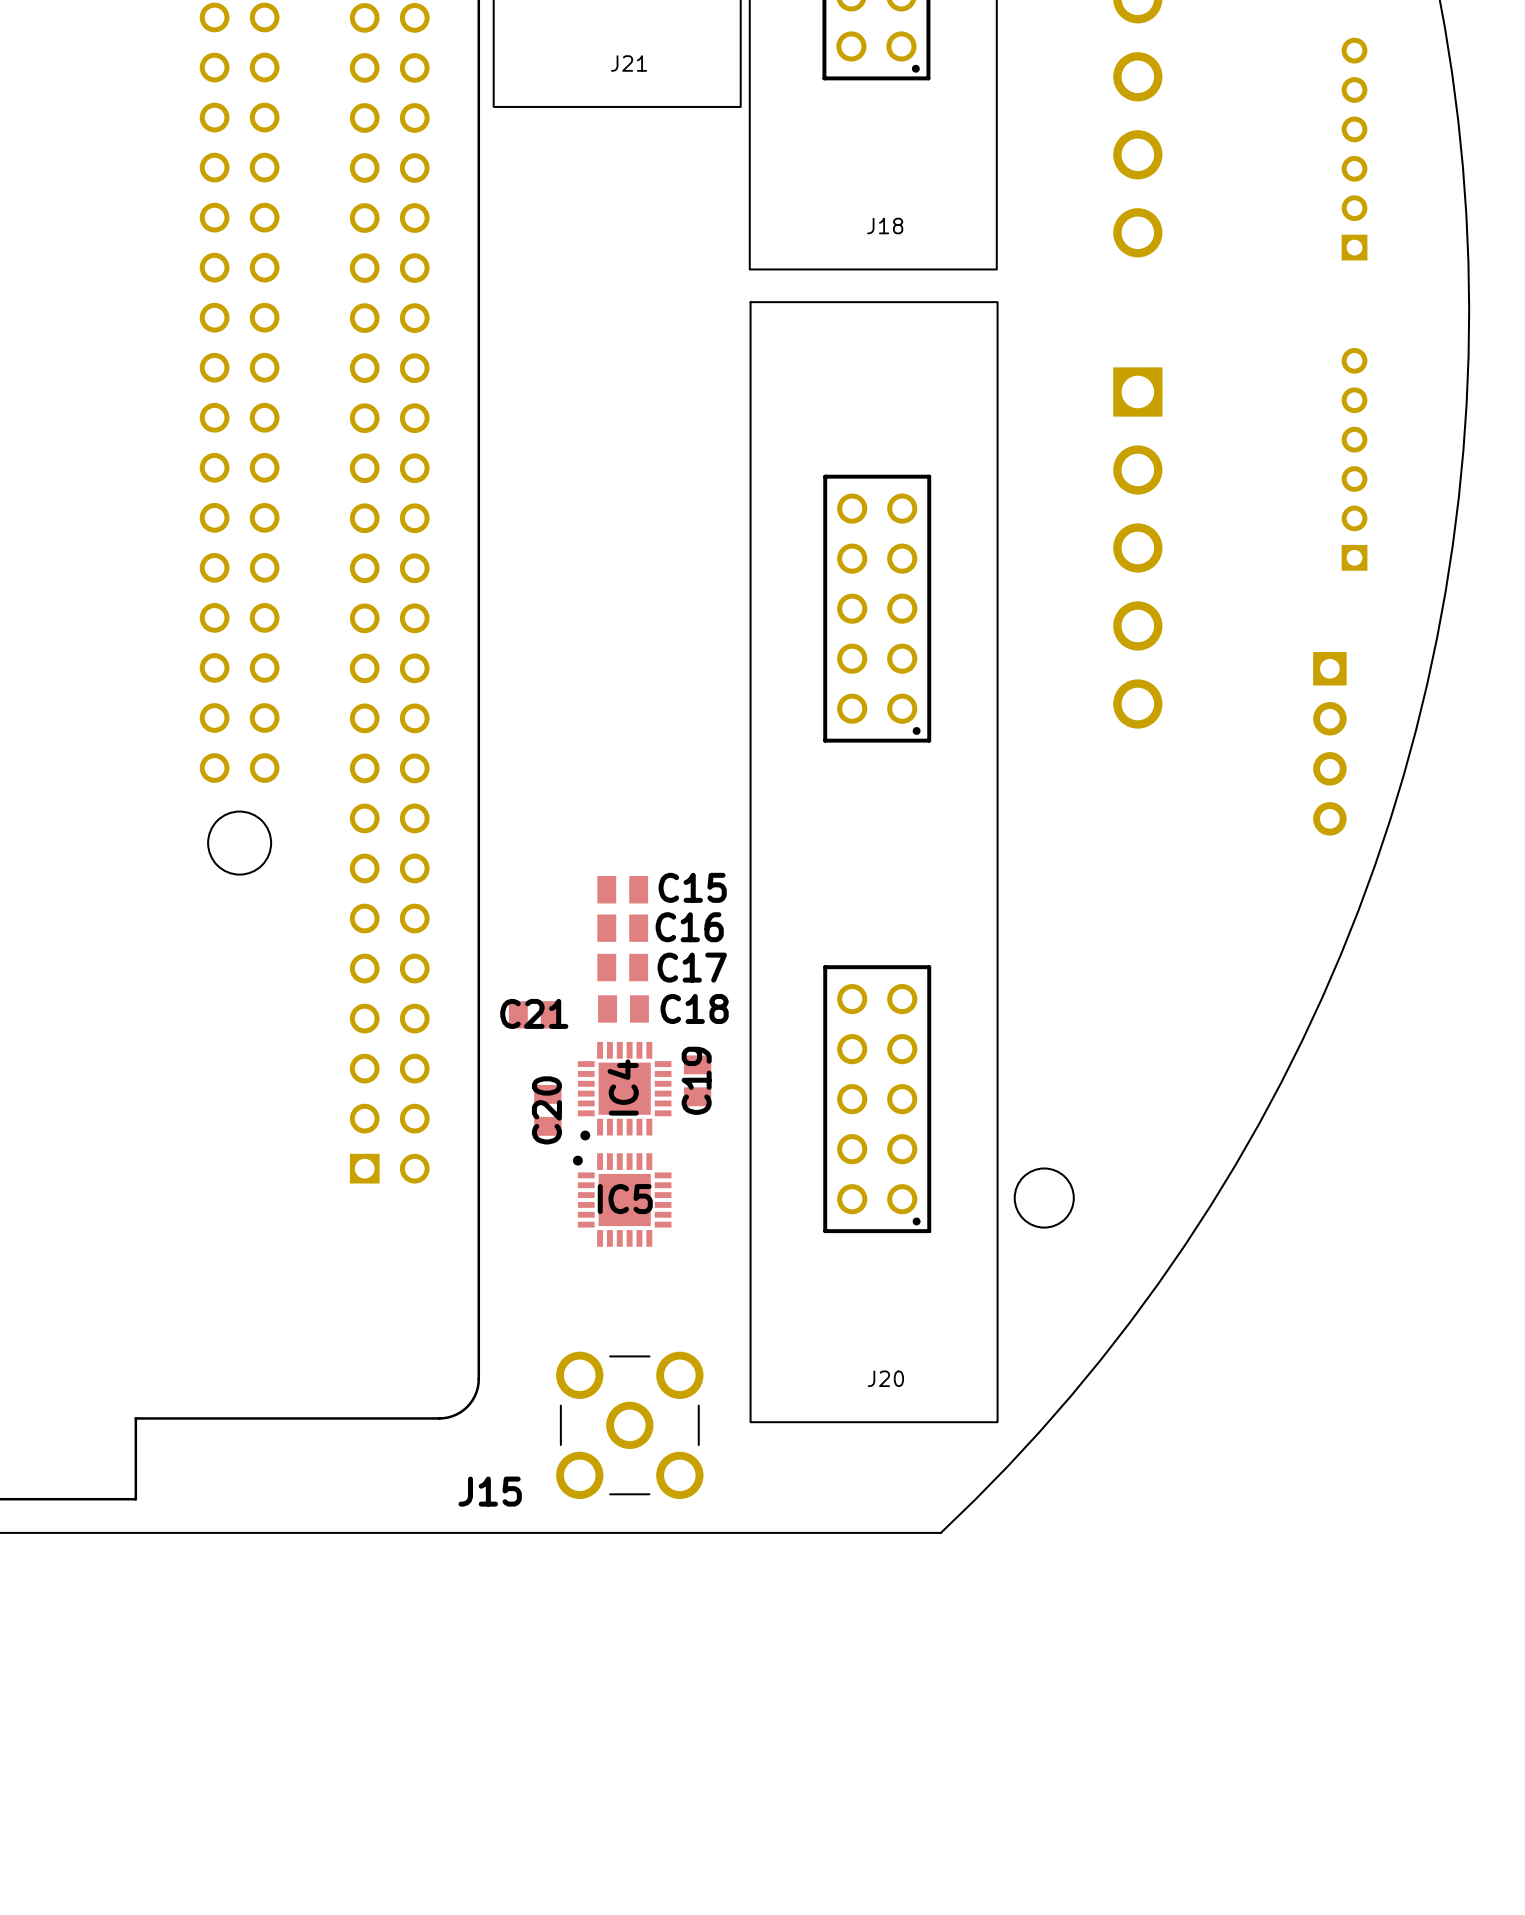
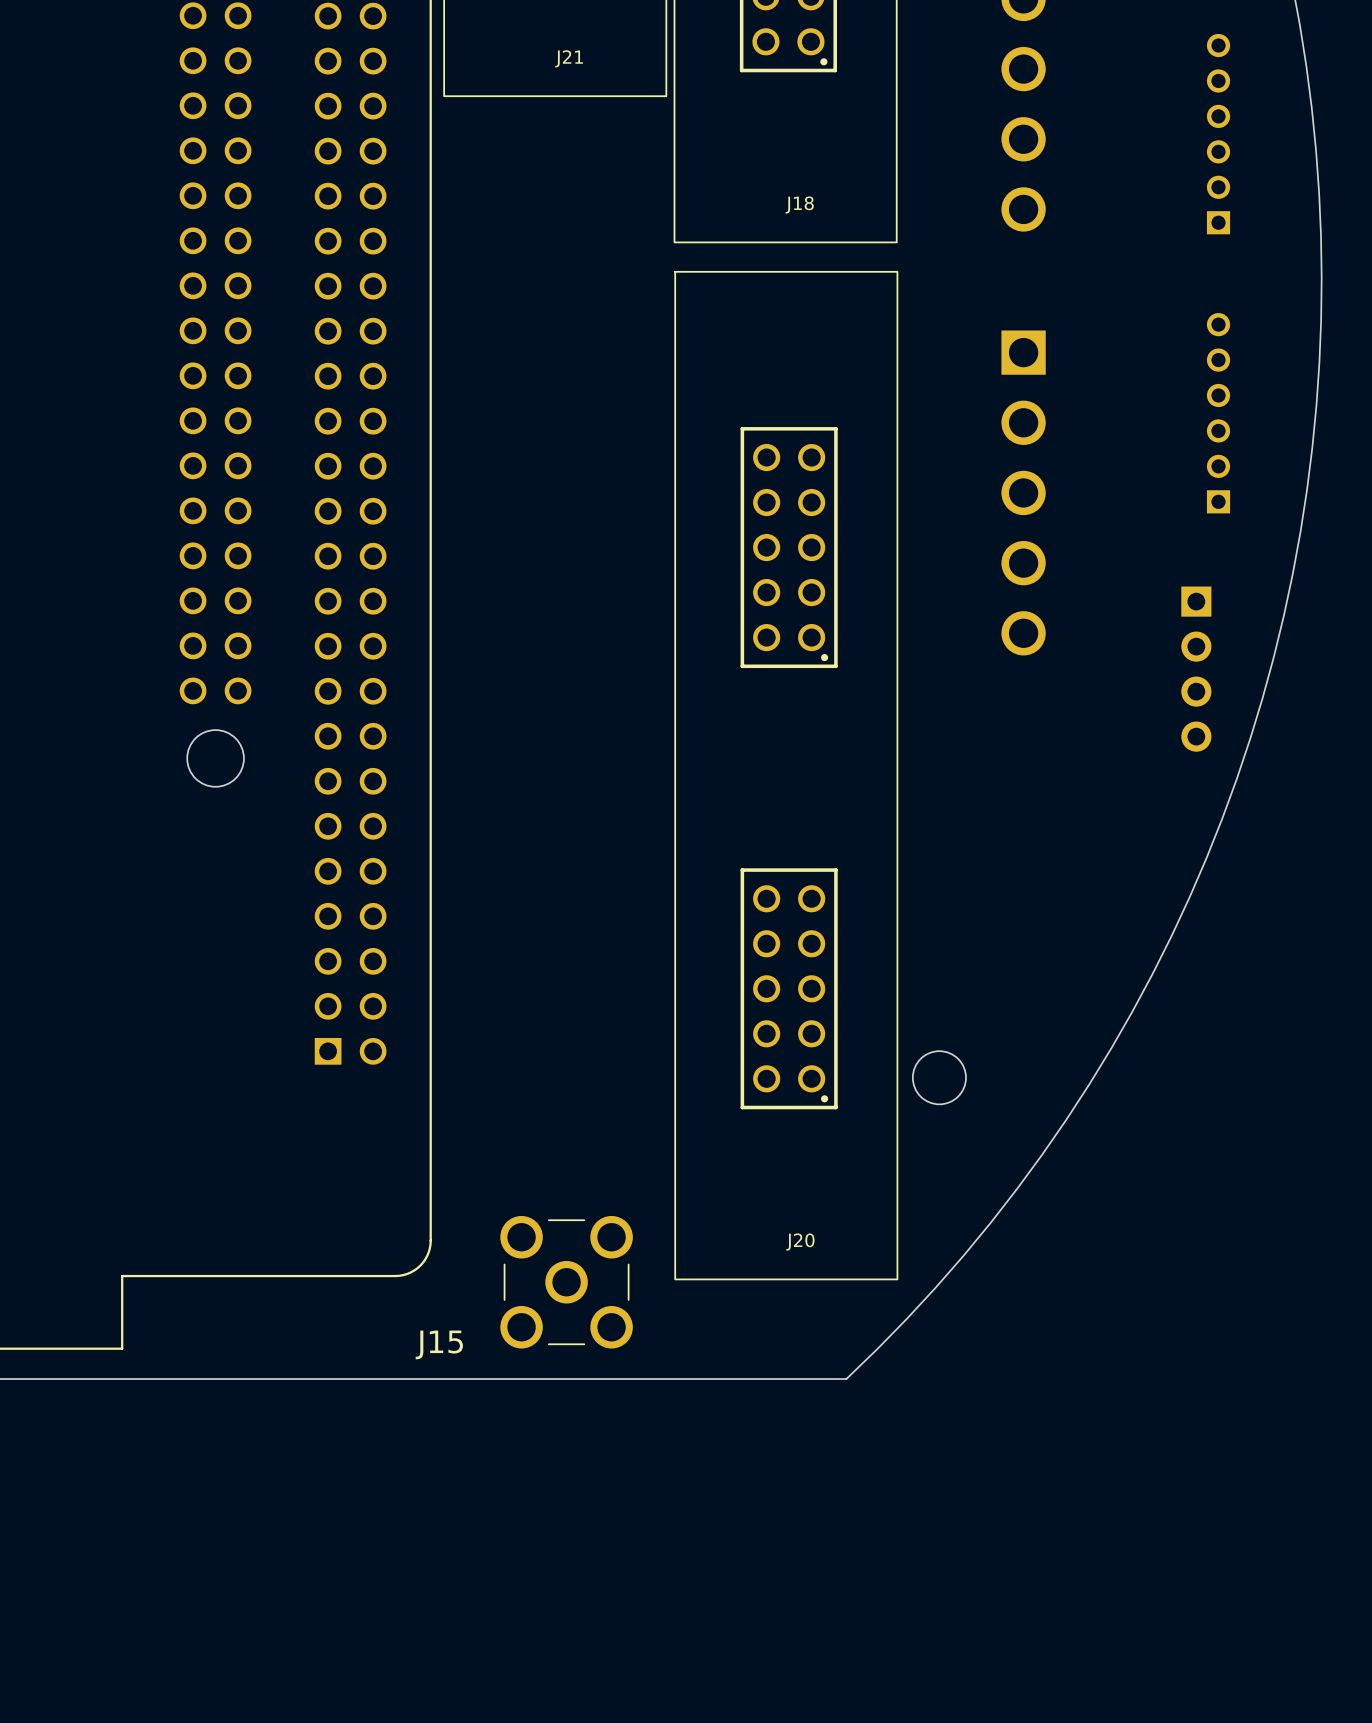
C15: (622, 889) -> none
C16: (622, 928) -> none
C17: (622, 967) -> none
C18: (623, 1008) -> none
C21: (534, 1014) -> none
C19: (697, 1080) -> none
IC4: (624, 1091) -> none
C20: (547, 1110) -> none
IC5: (622, 1200) -> none

